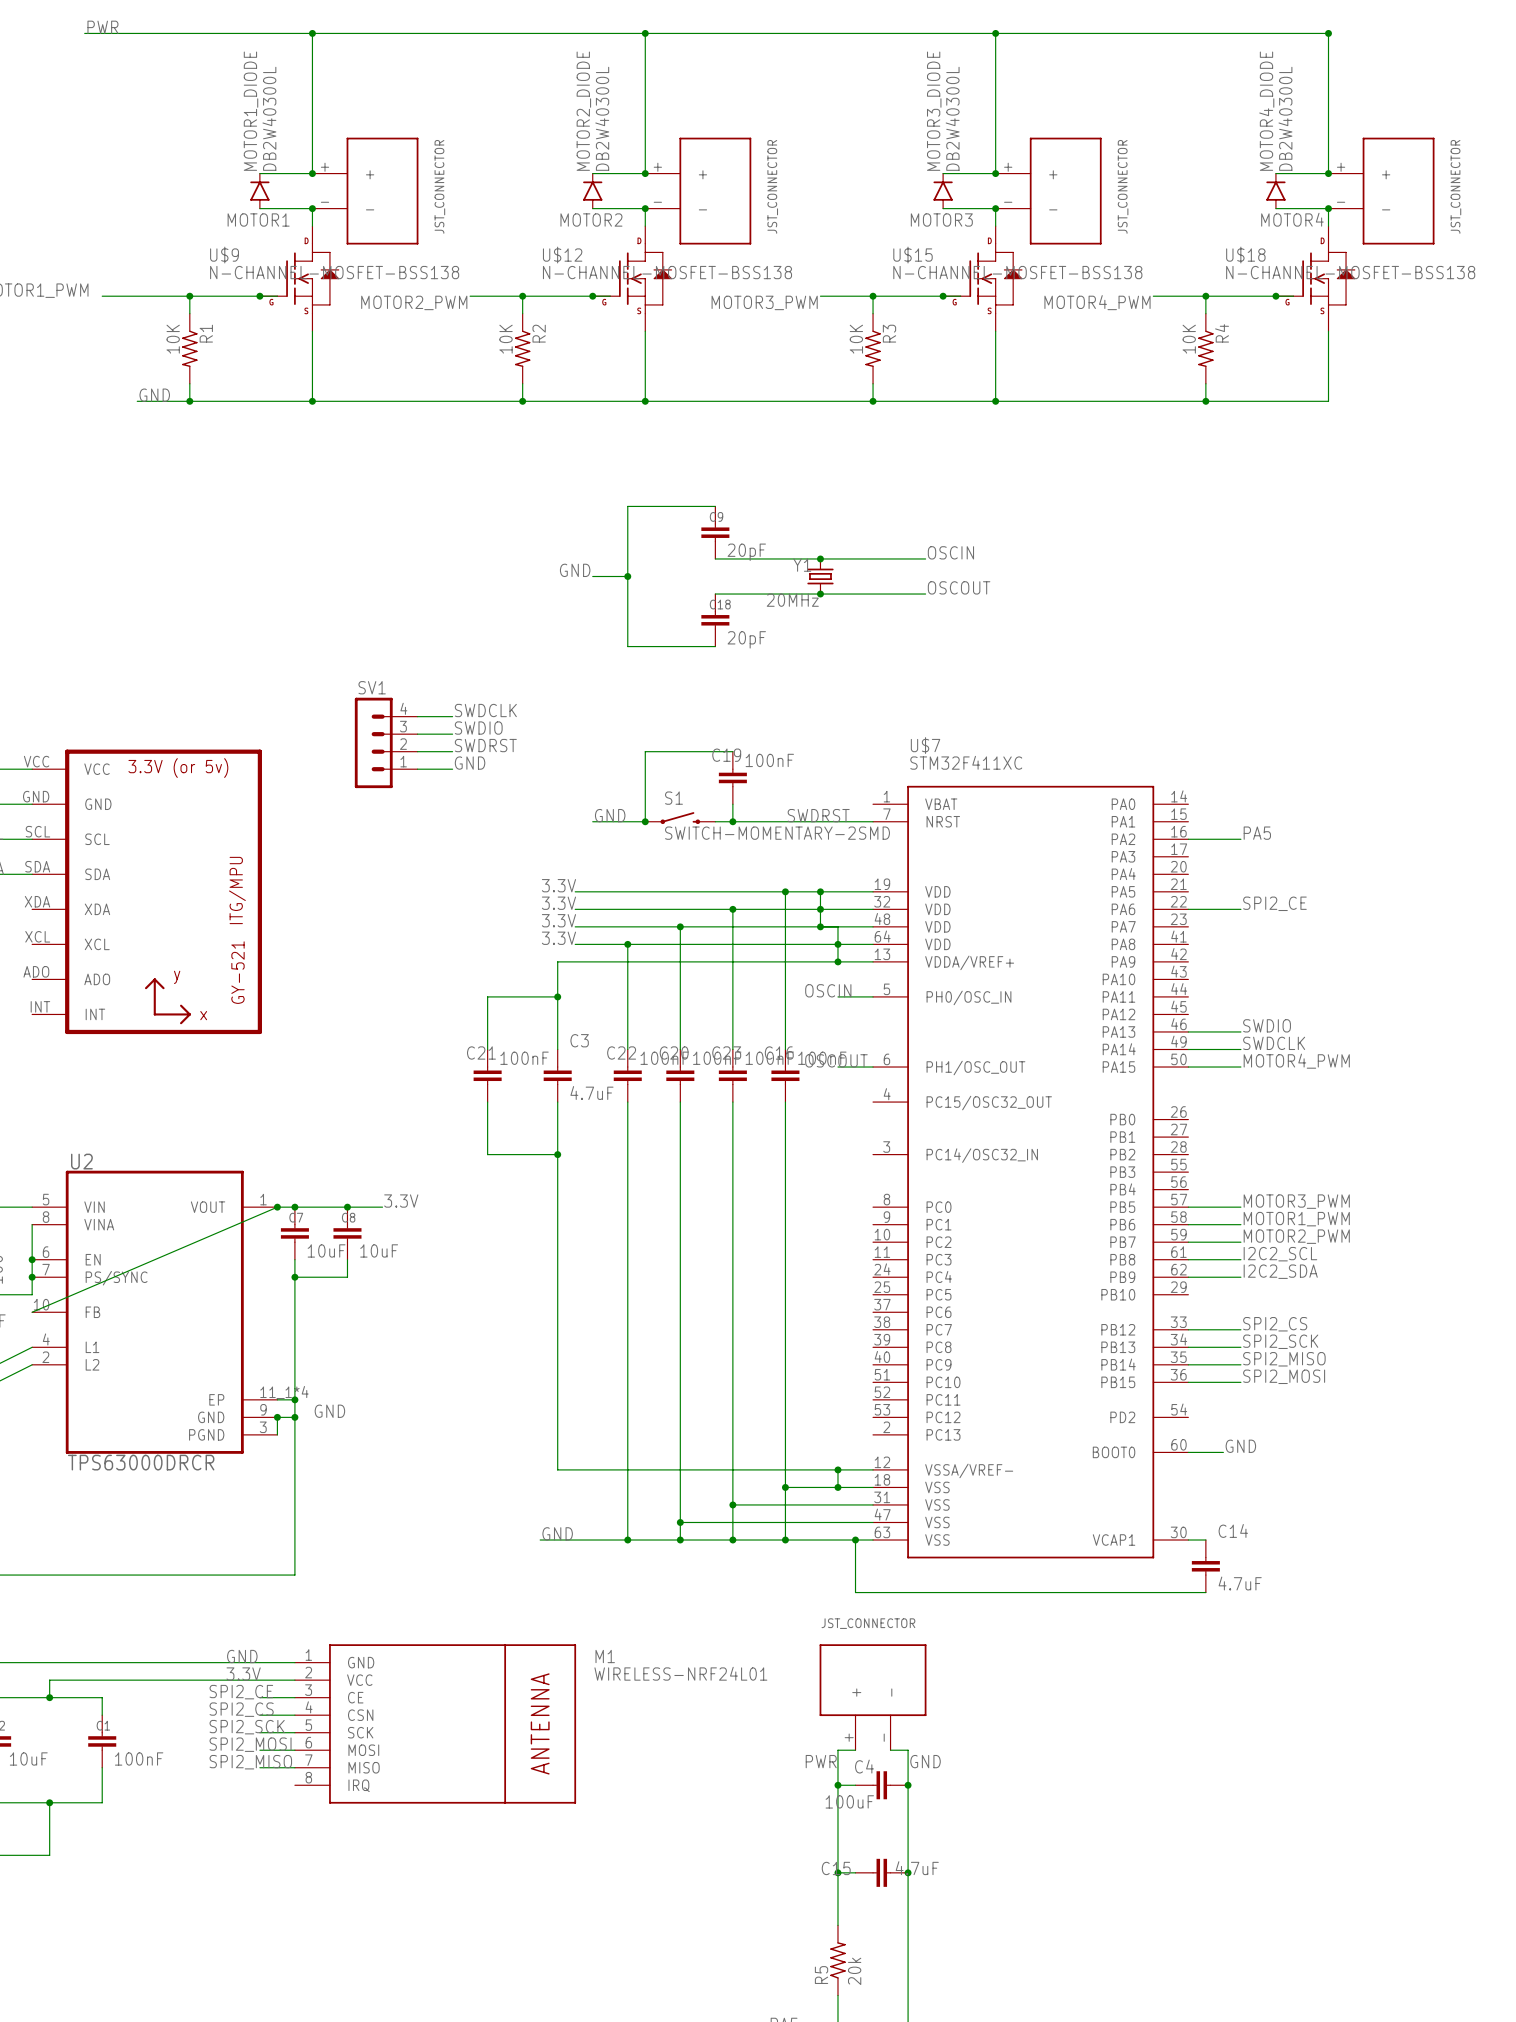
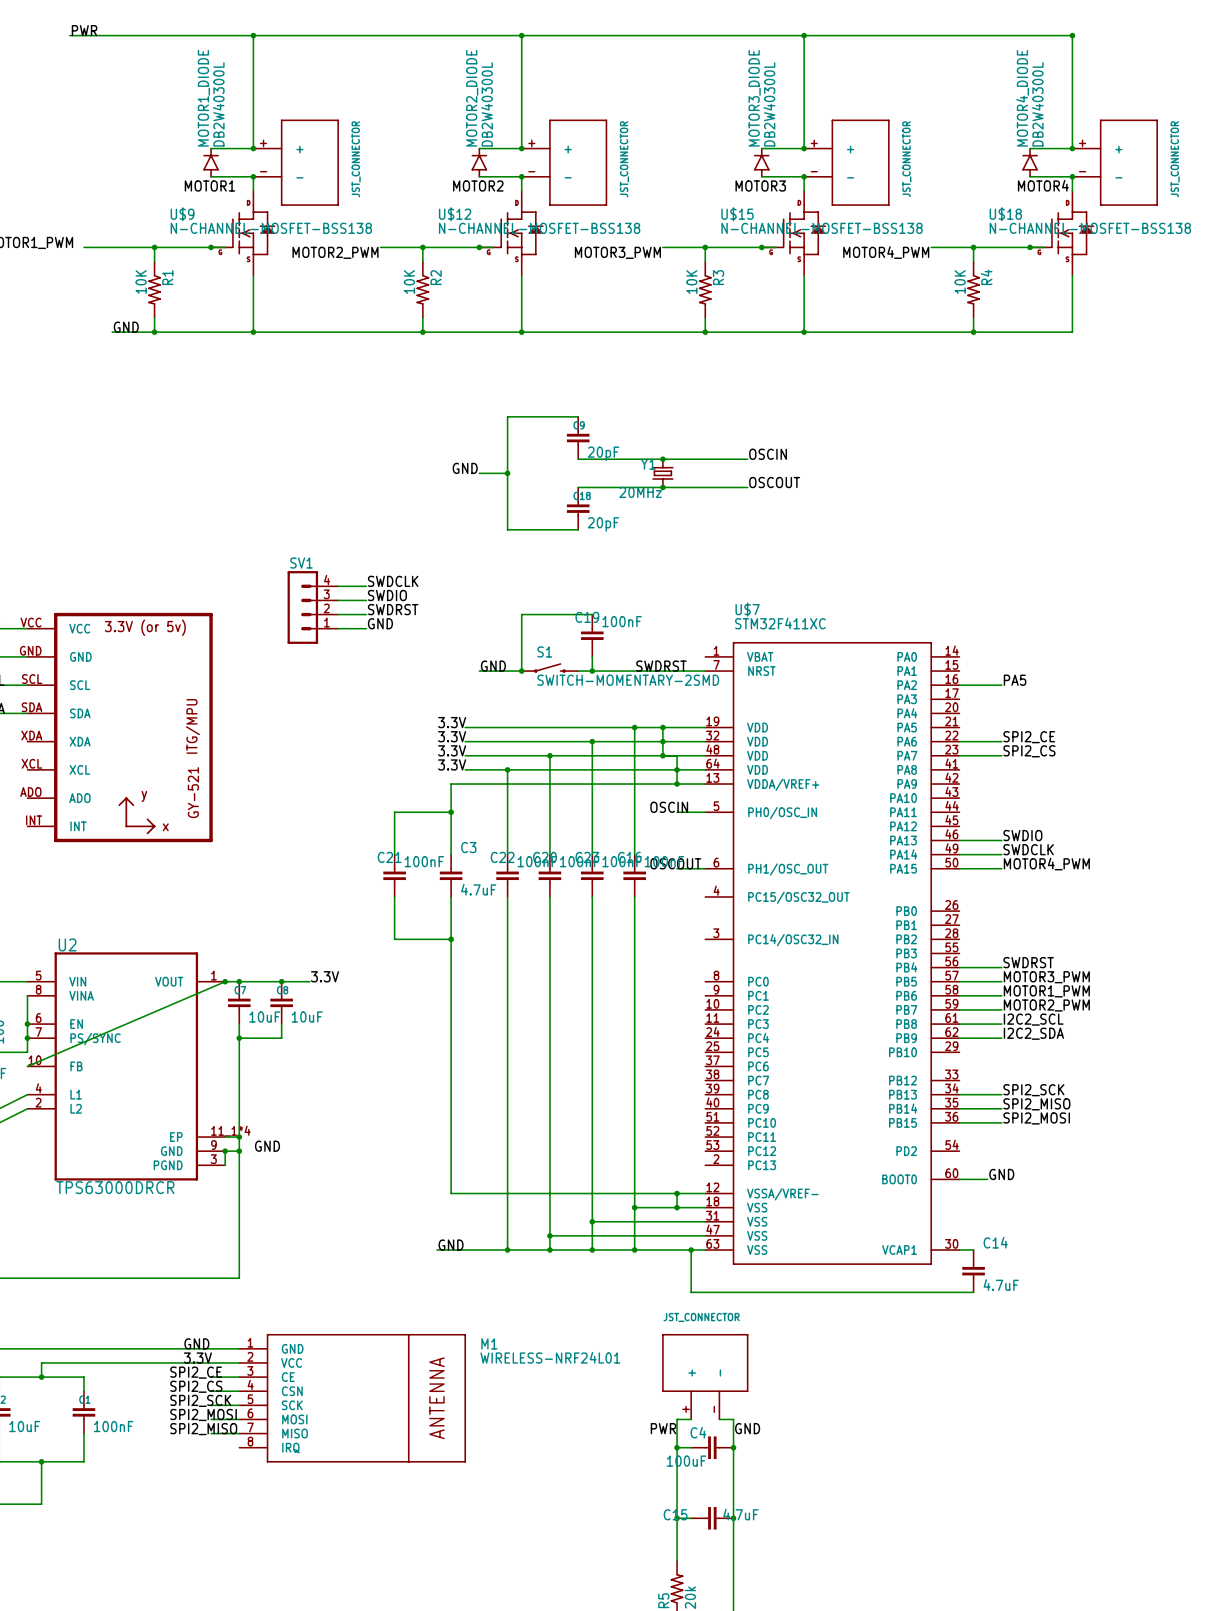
label: none -> SPI2_CS (1029, 751)
wire: none -> (959, 755) (1001, 755)
label: none -> SWDRST (1028, 962)
label: SPI2_CS (1275, 1324) -> none
wire: (1188, 1329) (1240, 1329) -> (959, 967) (1001, 967)

